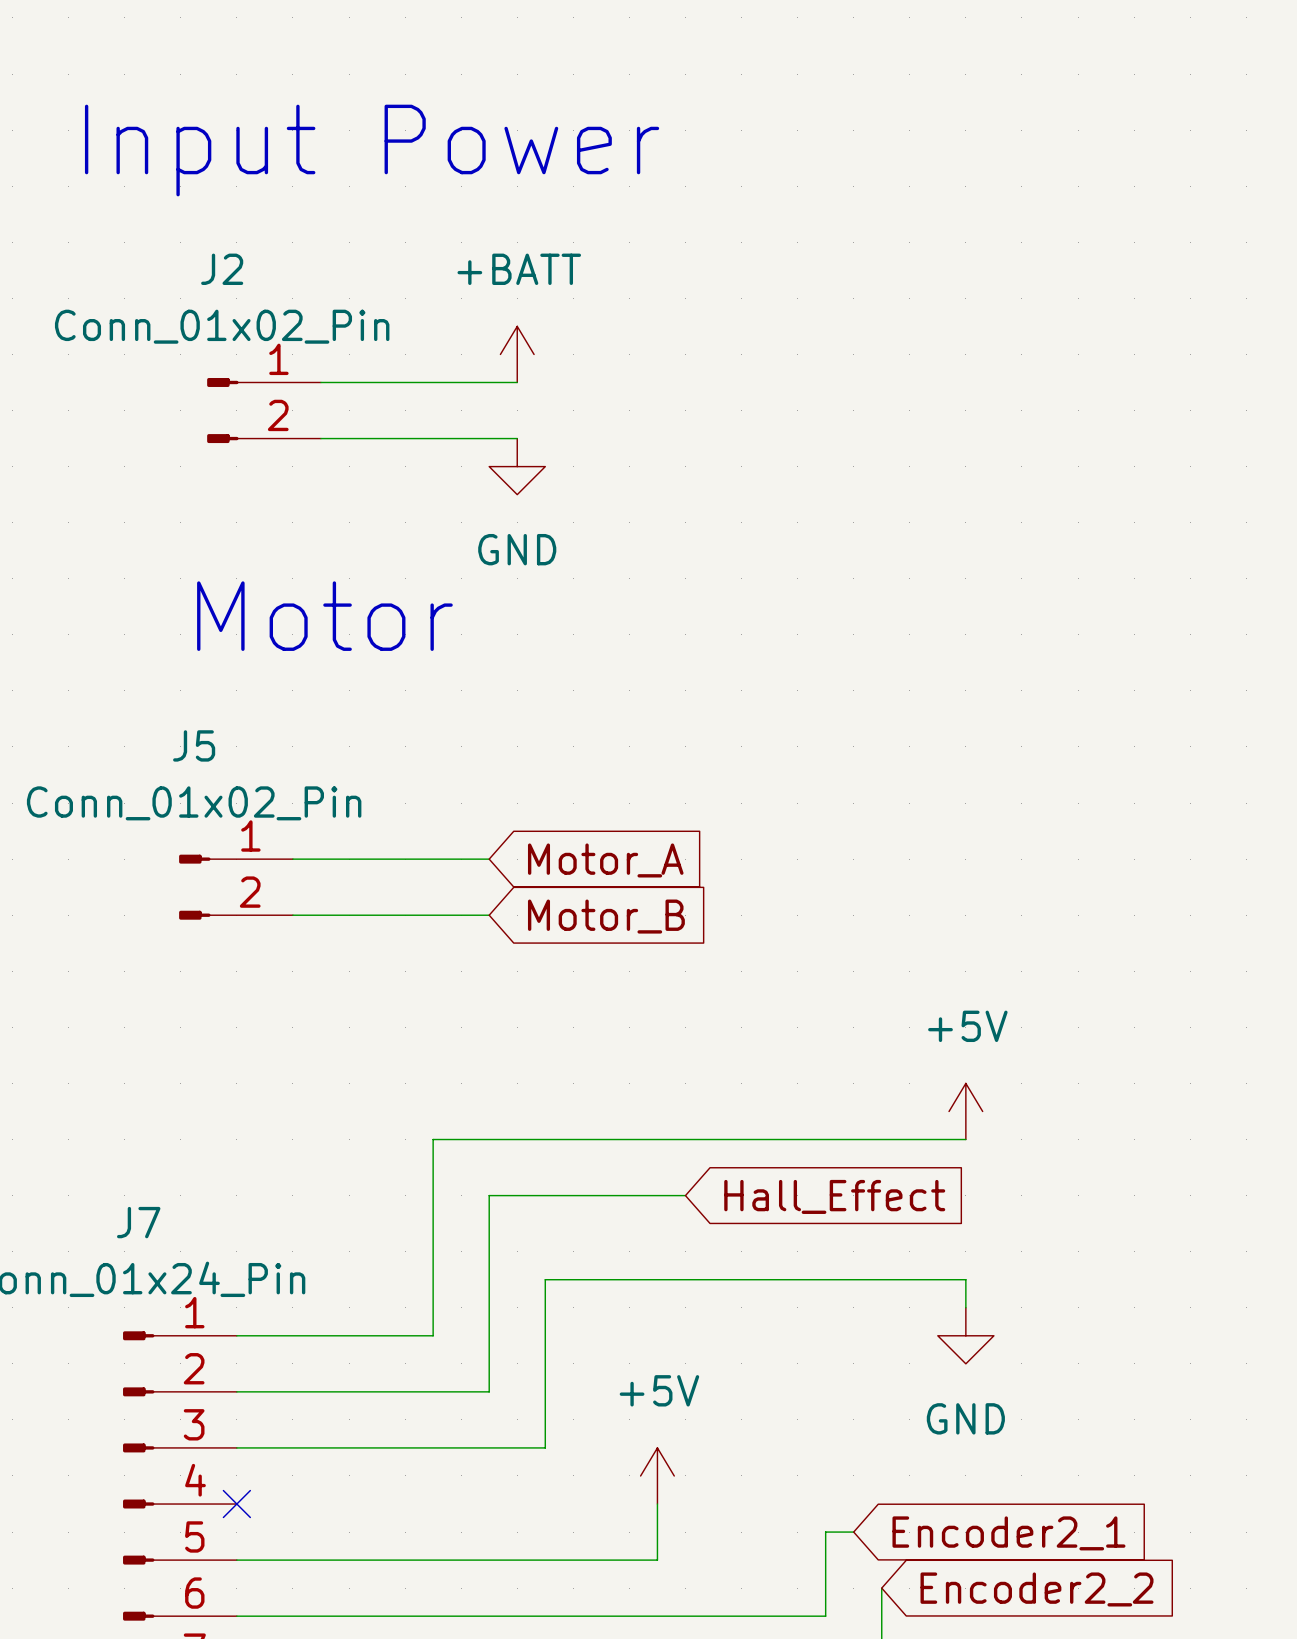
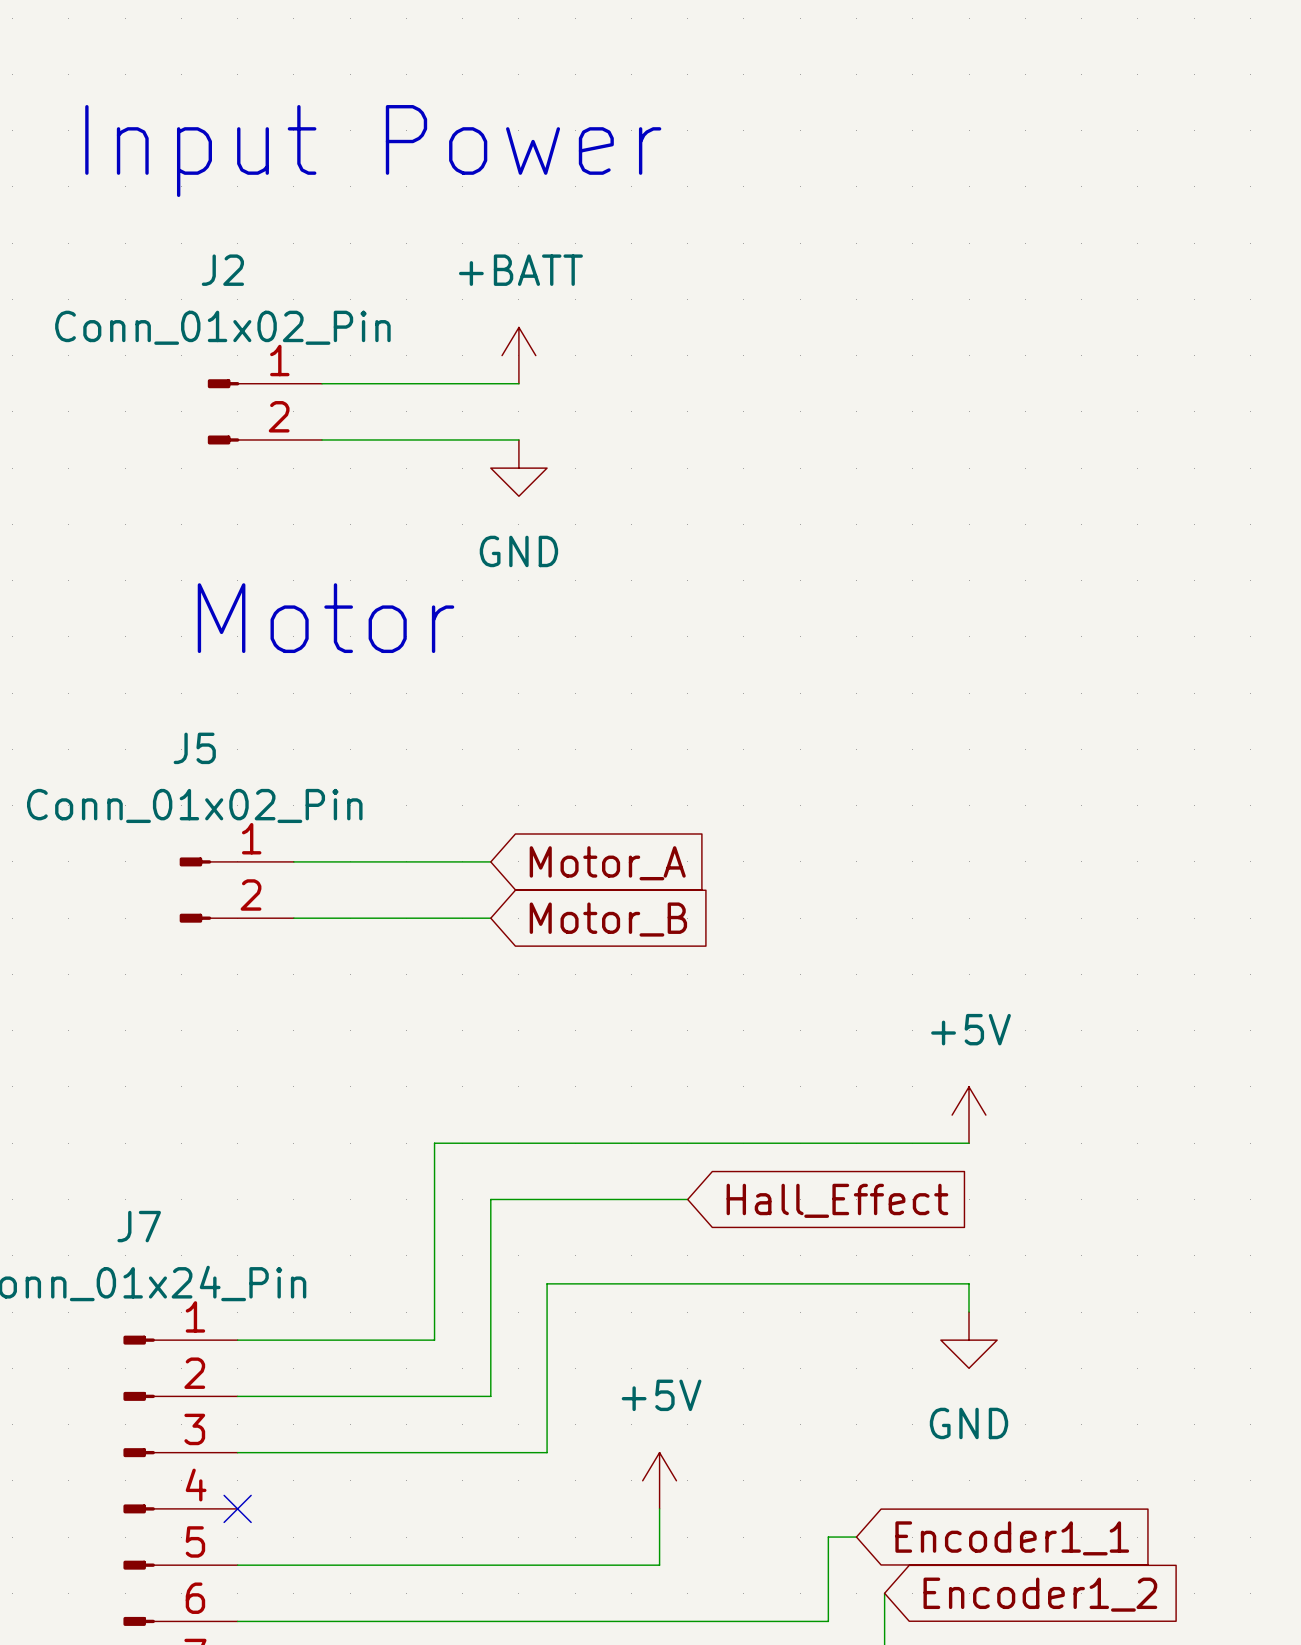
global label: Encoder2_1 (1008, 1533) -> Encoder1_1 (1012, 1538)
global label: Encoder2_2 (1037, 1589) -> Encoder1_2 (1040, 1594)

